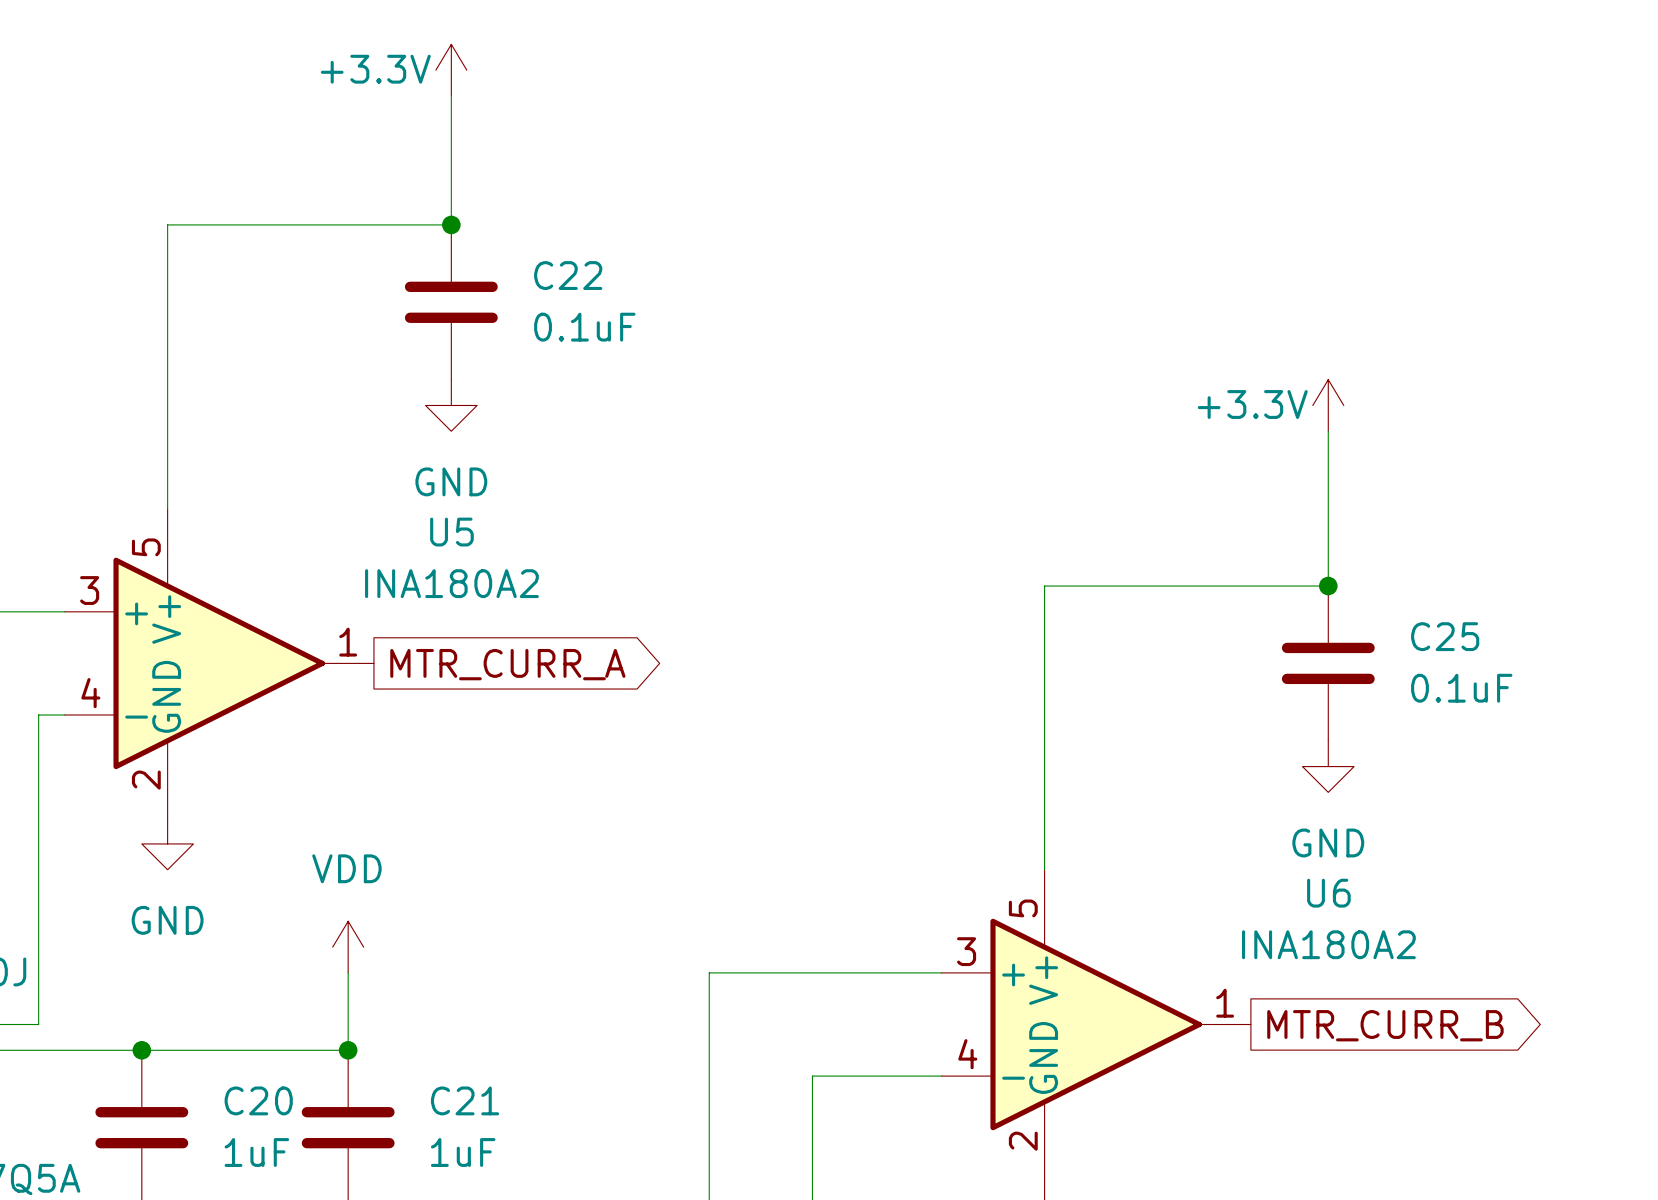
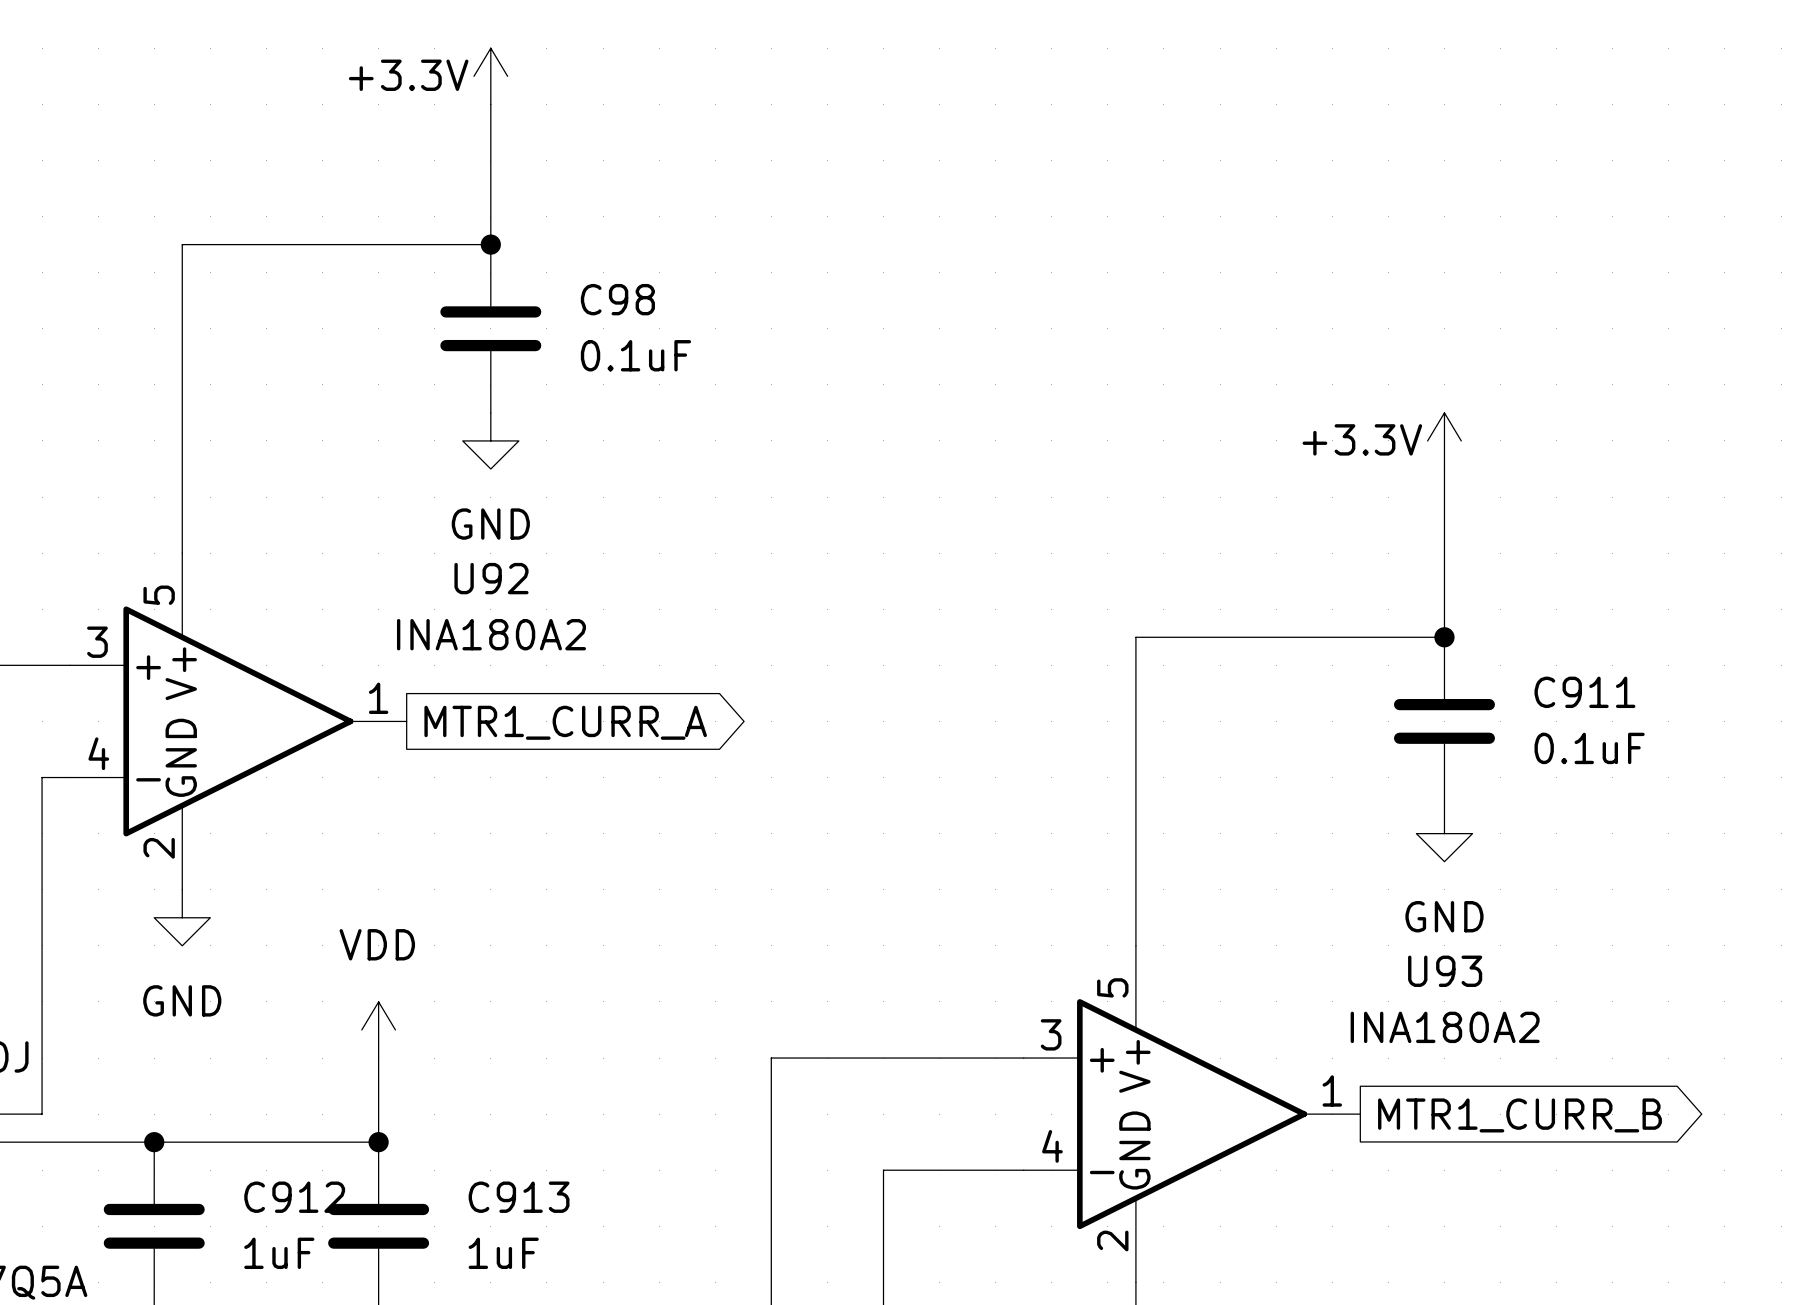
C22 name: C22 (568, 275) -> C98 (617, 299)
U5 name: U5 (451, 532) -> U92 (491, 578)
C25 name: C25 (1445, 636) -> C911 (1584, 692)
global label: MTR_CURR_A (507, 664) -> MTR1_CURR_A (565, 722)
U6 name: U6 (1328, 893) -> U93 (1445, 971)
global label: MTR_CURR_B (1385, 1025) -> MTR1_CURR_B (1519, 1115)
C20 name: C20 (258, 1100) -> C912 (294, 1197)
C21 name: C21 (465, 1100) -> C913 (519, 1197)

